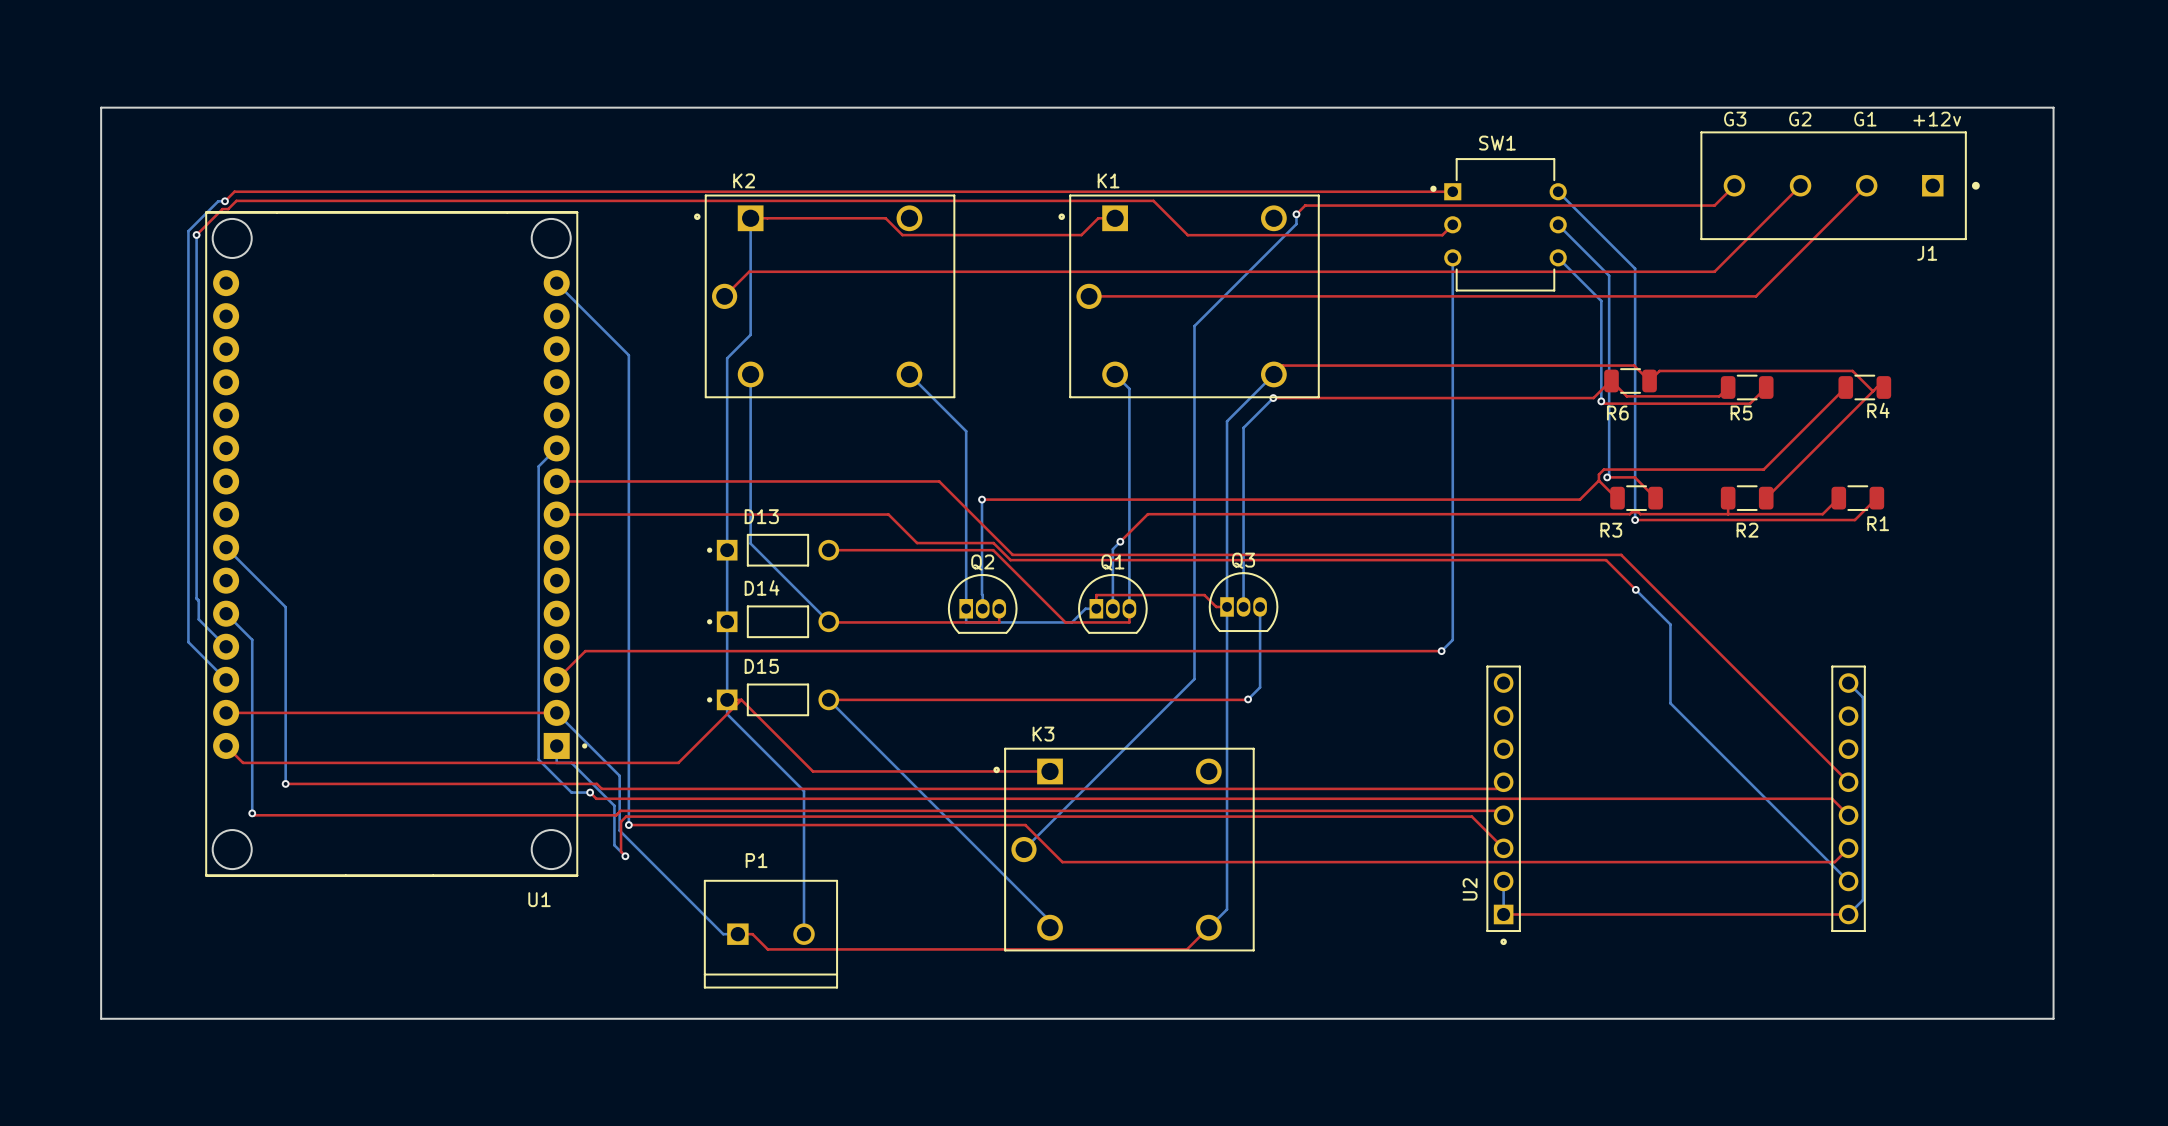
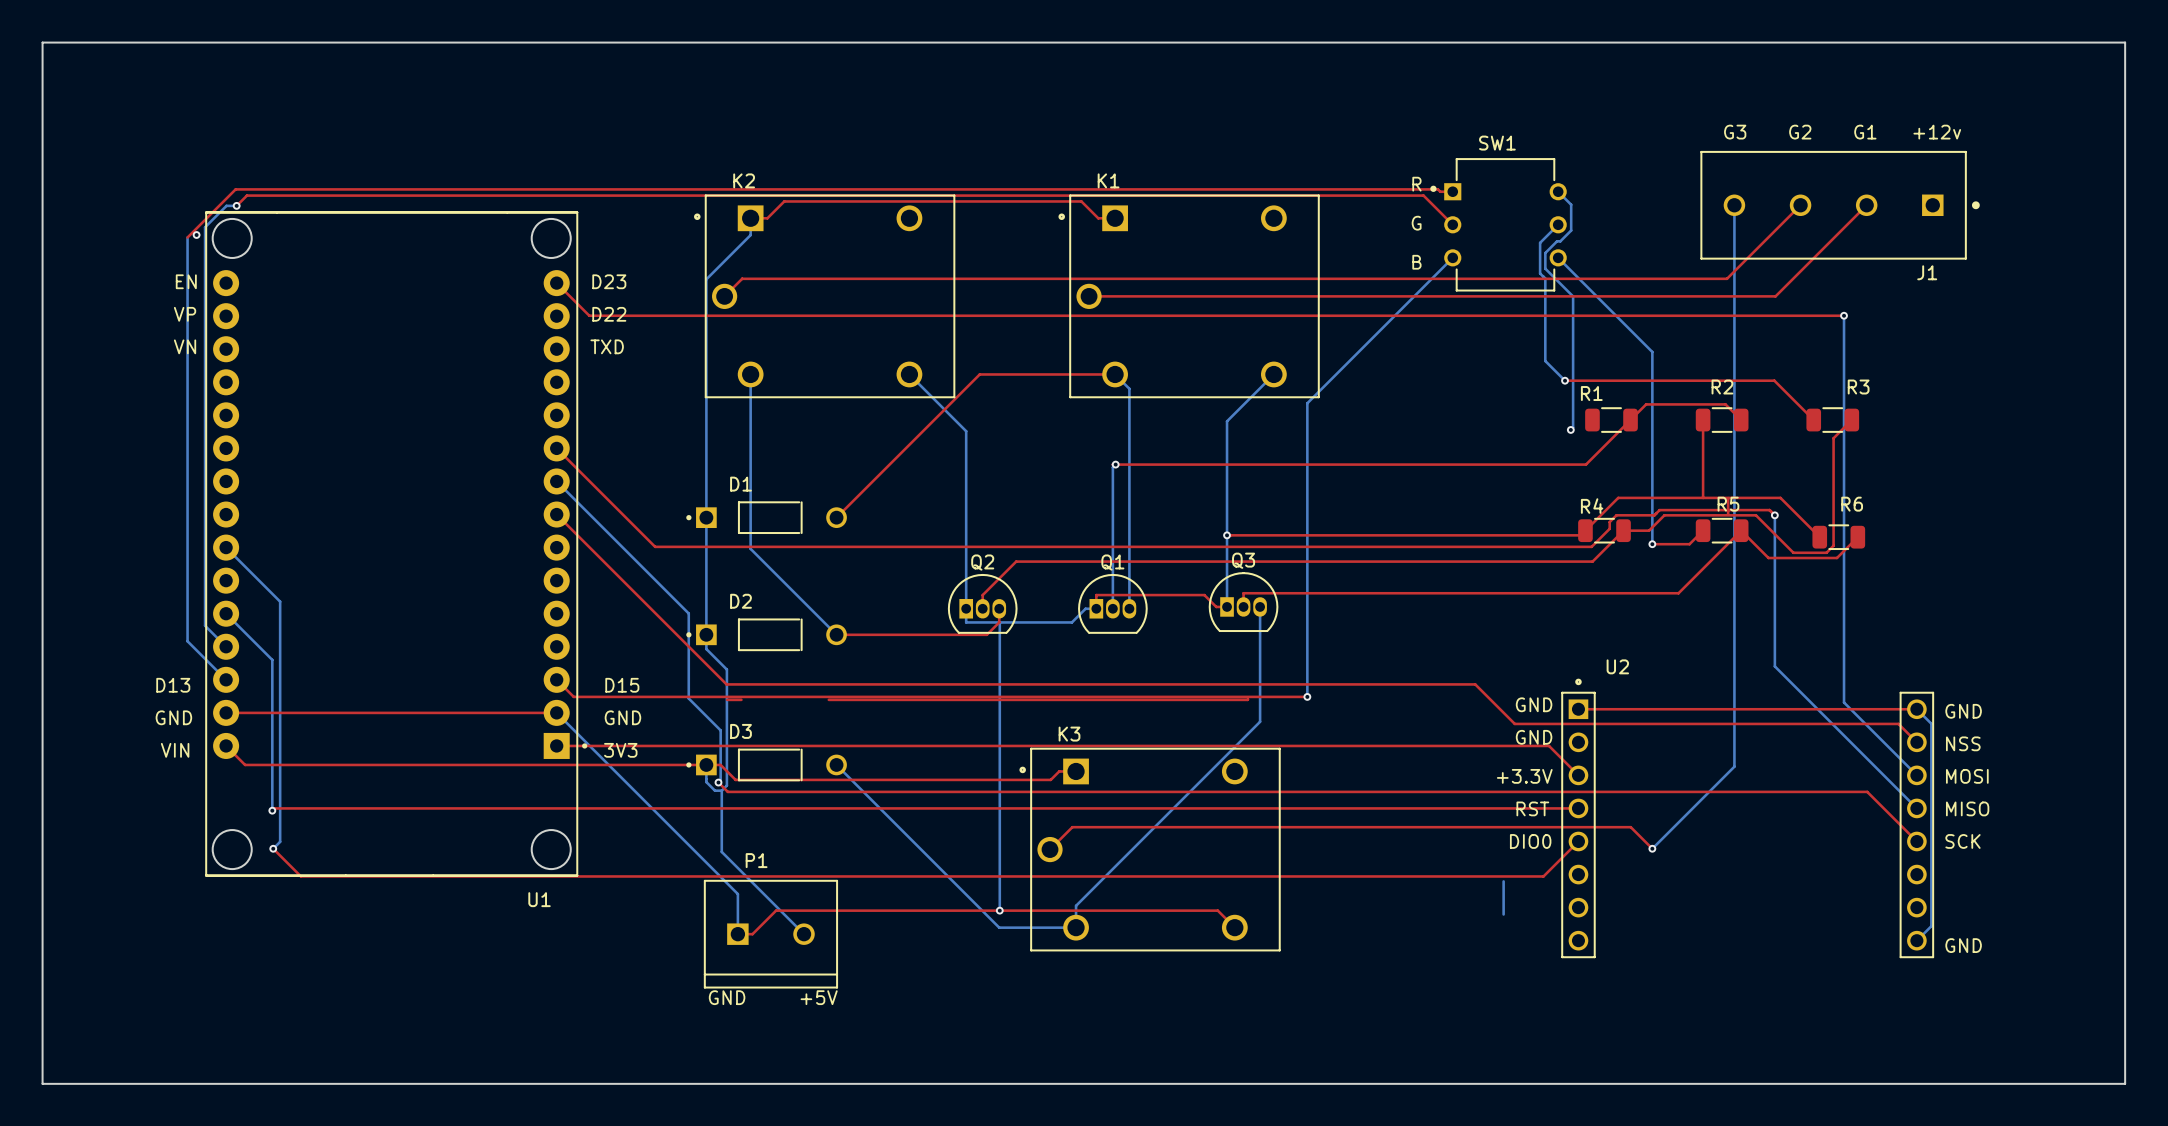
board edge: (101, 107) (2053, 107) (2053, 1018) (101, 1018) (101, 107) -> (42, 42) (42, 1083) (2125, 1083) (2125, 42) (42, 42)
text position: G3 (1735, 119) -> G3 (1735, 132)
text position: G2 (1800, 119) -> G2 (1800, 132)
text position: G1 (1865, 119) -> G1 (1865, 132)
text position: +12v (1937, 119) -> +12v (1937, 132)
text: none -> R (1416, 184)
top track: (1734, 185) (1714, 205) (1305, 205) (1296, 214) -> none
top track: (1800, 185) (1714, 271) (749, 271) (742, 278) -> (1800, 205) (1727, 278) (742, 278)
J1 position: (1840, 185) -> (1840, 205)
top track: (1866, 185) (1756, 296) -> (1866, 205) (1775, 296) (1756, 296)
top track: (1440, 191) (234, 191) (225, 201) -> (1440, 191) (1437, 189) (235, 189) (187, 237)
bottom track: (225, 201) (218, 201) (188, 231) (188, 642) -> (187, 237) (188, 642)
via position: (225, 201) -> (236, 205)
bottom track: (1571, 204) (1635, 268) (1635, 520) -> (1571, 204) (1571, 230) (1545, 253) (1545, 268) (1573, 296) (1573, 427) (1570, 429)
bottom track: none -> (1734, 205) (1734, 766) (1652, 848)
bottom track: (1296, 214) (1296, 224) (1194, 326) (1194, 679) (1023, 849) -> none
via: (1296, 214) -> none
top track: (767, 218) (885, 218) (902, 235) (1081, 235) (1098, 218) -> (767, 218) (784, 201) (1081, 201) (1098, 218)
text: none -> G (1416, 223)
top track: (1452, 224) (1442, 235) (1187, 235) (1153, 200) (236, 200) (228, 209) (222, 209) (196, 234) -> (1452, 224) (1423, 195) (246, 195) (236, 205)
bottom track: (1558, 224) (1609, 275) (1609, 475) (1607, 477) -> (1558, 224) (1540, 242) (1540, 273) (1545, 278) (1545, 361) (1565, 380)
bottom track: (196, 235) (196, 598) (198, 600) (198, 619) (205, 625) -> (236, 205) (226, 205) (205, 227) (205, 625)
bottom track: (750, 235) (750, 334) (727, 358) (727, 714) (804, 791) (804, 934) -> (750, 235) (706, 279) (706, 649) (726, 669) (726, 785) (721, 790)
bottom track: (1452, 257) (1452, 639) (1441, 651) -> (1452, 257) (1307, 403) (1307, 696)
text: none -> B (1416, 262)
text: none -> EN (186, 281)
text: none -> D23 (609, 281)
top track: none -> (556, 283) (589, 315) (1844, 315)
bottom track: (556, 283) (628, 355) (628, 825) -> none
bottom track: (1601, 300) (1601, 401) -> (1601, 300) (1652, 352) (1652, 544)
text: none -> VP (185, 314)
text: none -> D22 (609, 314)
bottom track: none -> (1844, 315) (1844, 702) (1916, 775)
via: none -> (1844, 315)
text: none -> VN (185, 346)
text: none -> TXD (607, 346)
top track: none -> (1115, 374) (979, 374) (836, 517)
top track: (1273, 374) (1282, 365) (1634, 365) (1649, 380) (1659, 370) (1852, 370) (1873, 391) -> none
top track: none -> (1565, 380) (1774, 380) (1813, 420)
via: none -> (1565, 380)
R6 position: (1630, 380) -> (1838, 537)
top track: (1728, 387) (1719, 396) (1626, 396) (1610, 380) (1593, 398) (1273, 398) -> none
R5 position: (1747, 387) -> (1722, 530)
top track: (1766, 387) (1750, 403) (1603, 403) (1601, 401) -> none
top track: (1845, 387) (1763, 469) (1603, 469) (1598, 474) (1598, 480) -> none
R4 position: (1864, 387) -> (1604, 530)
top track: (1883, 387) (1876, 387) (1766, 498) -> none
bottom track: (1273, 398) (1243, 427) (1243, 606) -> none
via: (1273, 398) -> none
via: (1601, 401) -> none
R4 name position: R4 (1878, 410) -> R4 (1592, 506)
R6 name position: R6 (1617, 413) -> R6 (1852, 504)
R5 name position: R5 (1741, 413) -> R5 (1728, 504)
top track: none -> (1703, 420) (1703, 497)
top track: none -> (1741, 420) (1725, 404) (1646, 404) (1585, 464) (1112, 464)
top track: none -> (1851, 420) (1833, 438) (1833, 545) (1826, 552) (1793, 552) (1756, 515) (1664, 515) (1649, 530) (1623, 530) (1592, 561) (1016, 561) (982, 595) (982, 608)
via: none -> (1570, 429)
top track: none -> (556, 448) (655, 546) (1591, 546) (1609, 528) (1609, 522) (1616, 515) (1654, 515) (1659, 510) (1769, 510) (1774, 515)
bottom track: (556, 448) (538, 466) (538, 759) (571, 792) (590, 792) -> none
via: none -> (1115, 464)
top track: (1607, 477) (1634, 477) (1655, 498) -> none
via: (1607, 477) -> none
top track: (1598, 480) (1617, 498) -> none
top track: (1598, 480) (1579, 499) (982, 499) -> none
top track: (556, 481) (939, 481) (1012, 554) (1621, 554) (1848, 782) -> none
bottom track: none -> (556, 481) (688, 613) (688, 698) (720, 730) (720, 780) (718, 782)
R3 position: (1636, 498) -> (1832, 420)
R2 position: (1747, 498) -> (1722, 420)
top track: (1838, 498) (1822, 514) (1640, 514) (1631, 512) (1629, 514) (1147, 514) (1120, 541) -> none
R1 position: (1857, 498) -> (1611, 420)
top track: (1876, 498) (1854, 520) (1635, 520) -> none
bottom track: (982, 499) (982, 608) -> none
via: (982, 499) -> none
top track: (556, 514) (888, 514) (917, 543) (993, 543) (1010, 560) (1606, 560) (1635, 589) -> (556, 514) (726, 684) (1475, 684) (1514, 723) (1898, 723) (1916, 742)
bottom track: none -> (1774, 515) (1774, 666) (1916, 808)
via: none -> (1774, 515)
D1: none -> (766, 517)
via: (1635, 520) -> none
R1 name position: R1 (1878, 523) -> R1 (1591, 393)
R3 name position: R3 (1611, 530) -> R3 (1858, 387)
top track: none -> (1703, 530) (1689, 544) (1652, 544)
R2 name position: R2 (1747, 530) -> R2 (1722, 387)
top track: none -> (1227, 535) (1580, 535) (1618, 497) (1780, 497) (1819, 537)
via: none -> (1227, 535)
top track: none -> (1857, 537) (1837, 558) (1768, 558) (1741, 530) (1678, 593) (1243, 593) (1243, 606)
bottom track: (1120, 541) (1112, 549) -> (1112, 464) (1115, 464) (1112, 467) (1112, 549)
via: (1120, 541) -> none
bottom track: (750, 543) (828, 621) -> (750, 543) (750, 548) (836, 634)
via: none -> (1652, 544)
D13: (773, 550) -> none
top track: (828, 550) (993, 550) (1065, 622) (1129, 622) (1129, 608) -> none
bottom track: (1635, 589) (1670, 624) (1670, 703) (1848, 881) -> none
via: (1635, 589) -> none
bottom track: (280, 601) (285, 607) (285, 783) -> (280, 601) (280, 841) (273, 848)
bottom track: (1227, 606) (1227, 909) (1208, 927) -> none
D14: (773, 621) -> none
top track: (828, 621) (999, 622) -> (836, 634) (986, 634) (999, 622)
bottom track: none -> (999, 622) (999, 910)
D2: none -> (766, 634)
bottom track: (252, 639) (252, 813) -> (252, 639) (272, 659) (272, 810)
top track: (1441, 651) (585, 651) (556, 679) -> (1307, 696) (573, 696) (556, 679)
via: (1441, 651) -> none
U2 footprint: [1486, 665, 1866, 946] -> [1561, 678, 1934, 959]
bottom track: (1848, 683) (1862, 697) (1862, 900) (1848, 914) -> (1916, 709) (1931, 723) (1931, 926) (1916, 940)
text: none -> D13 (173, 685)
text: none -> D15 (622, 685)
bottom track: (1260, 687) (1248, 699) -> (1260, 687) (1260, 721) (1076, 905) (1076, 927) (999, 927) (836, 764)
D15: (773, 699) -> none
bottom track: (828, 699) (1050, 921) (1050, 927) -> none
via position: (1248, 699) -> (1307, 696)
text: none -> GND (1534, 704)
top track: none -> (1578, 709) (1916, 709)
text: none -> GND (1963, 711)
text: none -> GND (173, 717)
text: none -> GND (622, 717)
text: none -> GND (1534, 737)
text: none -> NSS (1963, 743)
top track: none -> (556, 745) (1549, 745) (1578, 775)
bottom track: (556, 745) (556, 762) (571, 762) (614, 805) (614, 845) (625, 856) -> none
text: none -> VIN (175, 750)
text: none -> 3V3 (620, 750)
top track: (243, 762) (678, 762) (741, 699) (813, 771) (1050, 771) -> (243, 762) (245, 764) (720, 764) (735, 779) (1050, 779) (1059, 771) (1076, 771)
bottom track: none -> (706, 764) (706, 782) (714, 790) (721, 790)
D3: none -> (766, 764)
bottom track: (619, 775) (619, 830) (723, 934) (737, 934) -> (619, 775) (737, 894) (737, 934)
text: none -> +3.3V (1524, 776)
text: none -> MOSI (1967, 776)
top track: none -> (718, 782) (727, 791) (1867, 791) (1916, 841)
via: none -> (718, 782)
top track: (1503, 782) (1496, 788) (601, 788) (596, 783) (285, 783) -> none
via: (285, 783) -> none
bottom track: none -> (721, 790) (721, 851) (804, 934)
top track: (590, 792) (596, 798) (1832, 798) (1848, 815) -> none
via: (590, 792) -> none
text: none -> RST (1532, 808)
top track: none -> (1578, 808) (274, 808) (272, 810)
text: none -> MISO (1967, 808)
via: none -> (272, 810)
top track: (252, 813) (254, 815) (616, 815) (620, 810) (1499, 810) (1503, 815) -> none
via: (252, 813) -> none
top track: (628, 825) (1025, 825) (1062, 862) (1834, 862) (1848, 848) -> none
via: (628, 825) -> none
text: none -> DIO0 (1530, 841)
top track: none -> (1578, 841) (1543, 876) (300, 876) (273, 848)
text: none -> SCK (1962, 841)
via: none -> (273, 848)
top track: (1503, 848) (1471, 816) (626, 816) (621, 821) (621, 851) (625, 856) -> none
top track: none -> (1652, 848) (1630, 827) (1072, 827) (1050, 849)
via: none -> (1652, 848)
K3 position: (1123, 849) -> (1150, 849)
via: (625, 856) -> none
U2 name position: U2 (1470, 889) -> U2 (1617, 666)
via: none -> (999, 910)
top track: (1503, 914) (1848, 914) -> none
top track: (1208, 927) (1187, 949) (767, 949) (752, 934) -> (1234, 927) (1217, 910) (776, 910) (752, 934)
text: none -> GND (1963, 945)
text: none -> GND (727, 997)
text: none -> +5V (819, 997)

